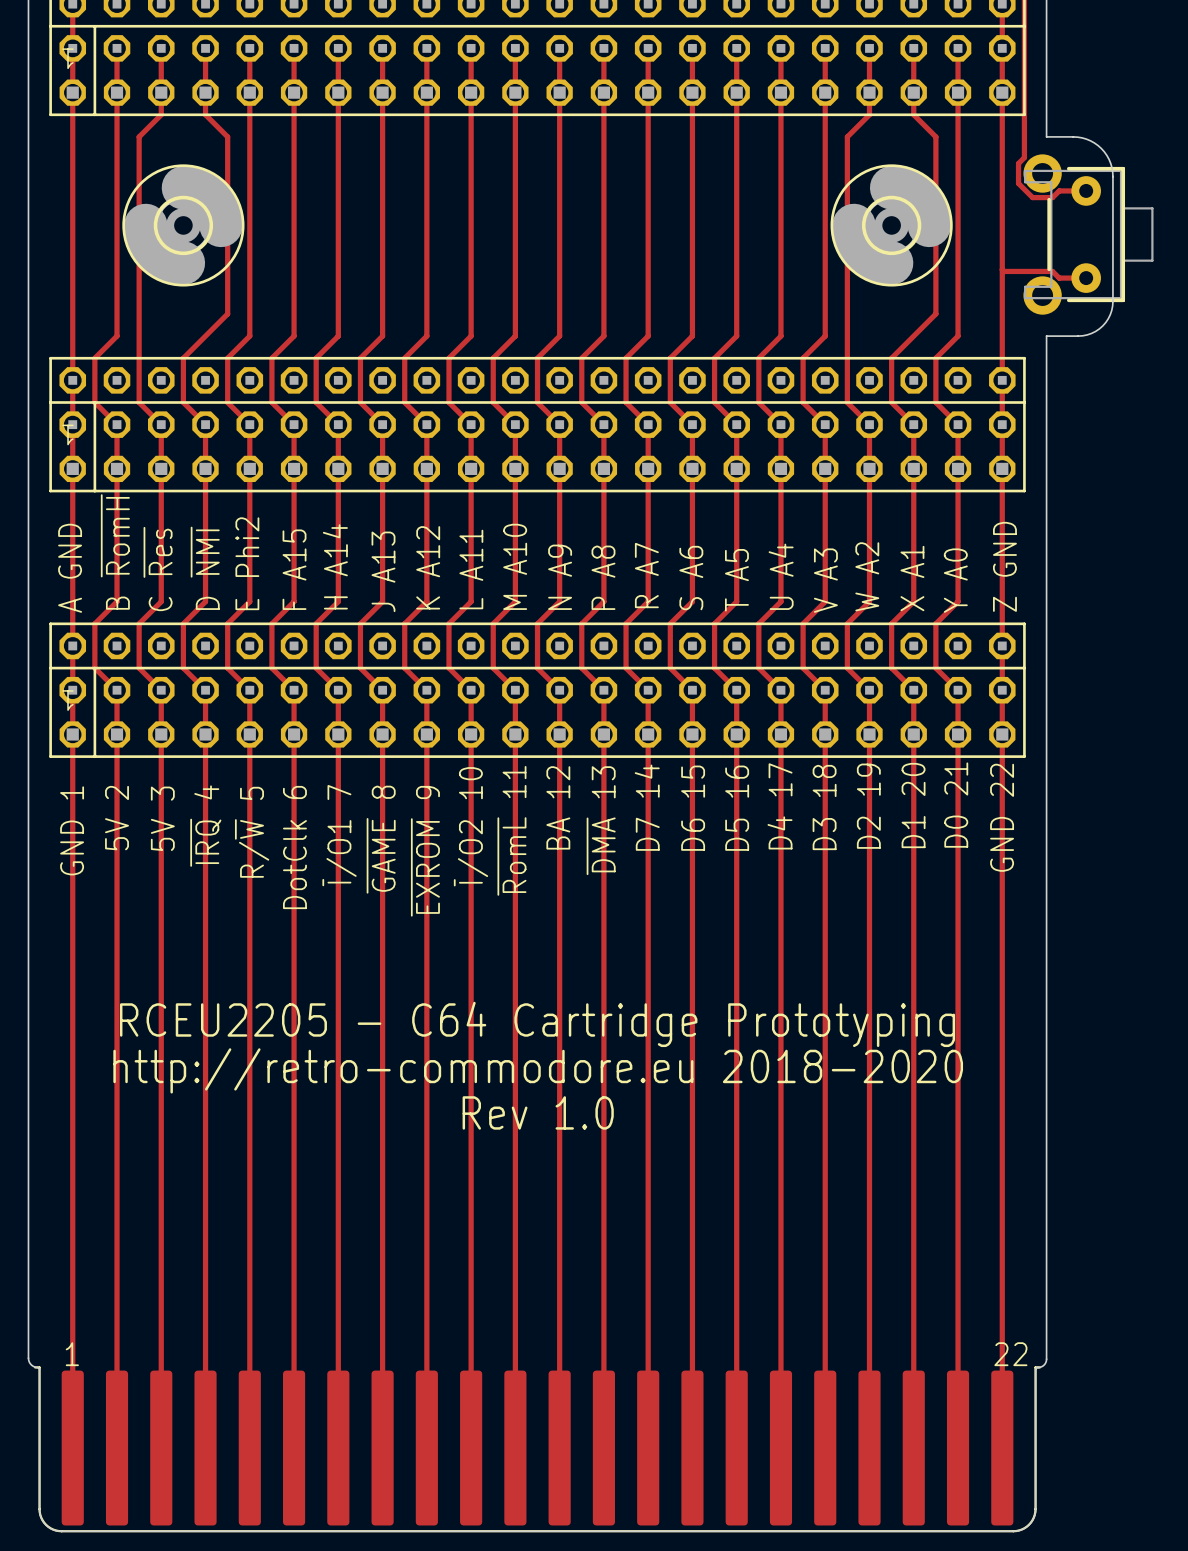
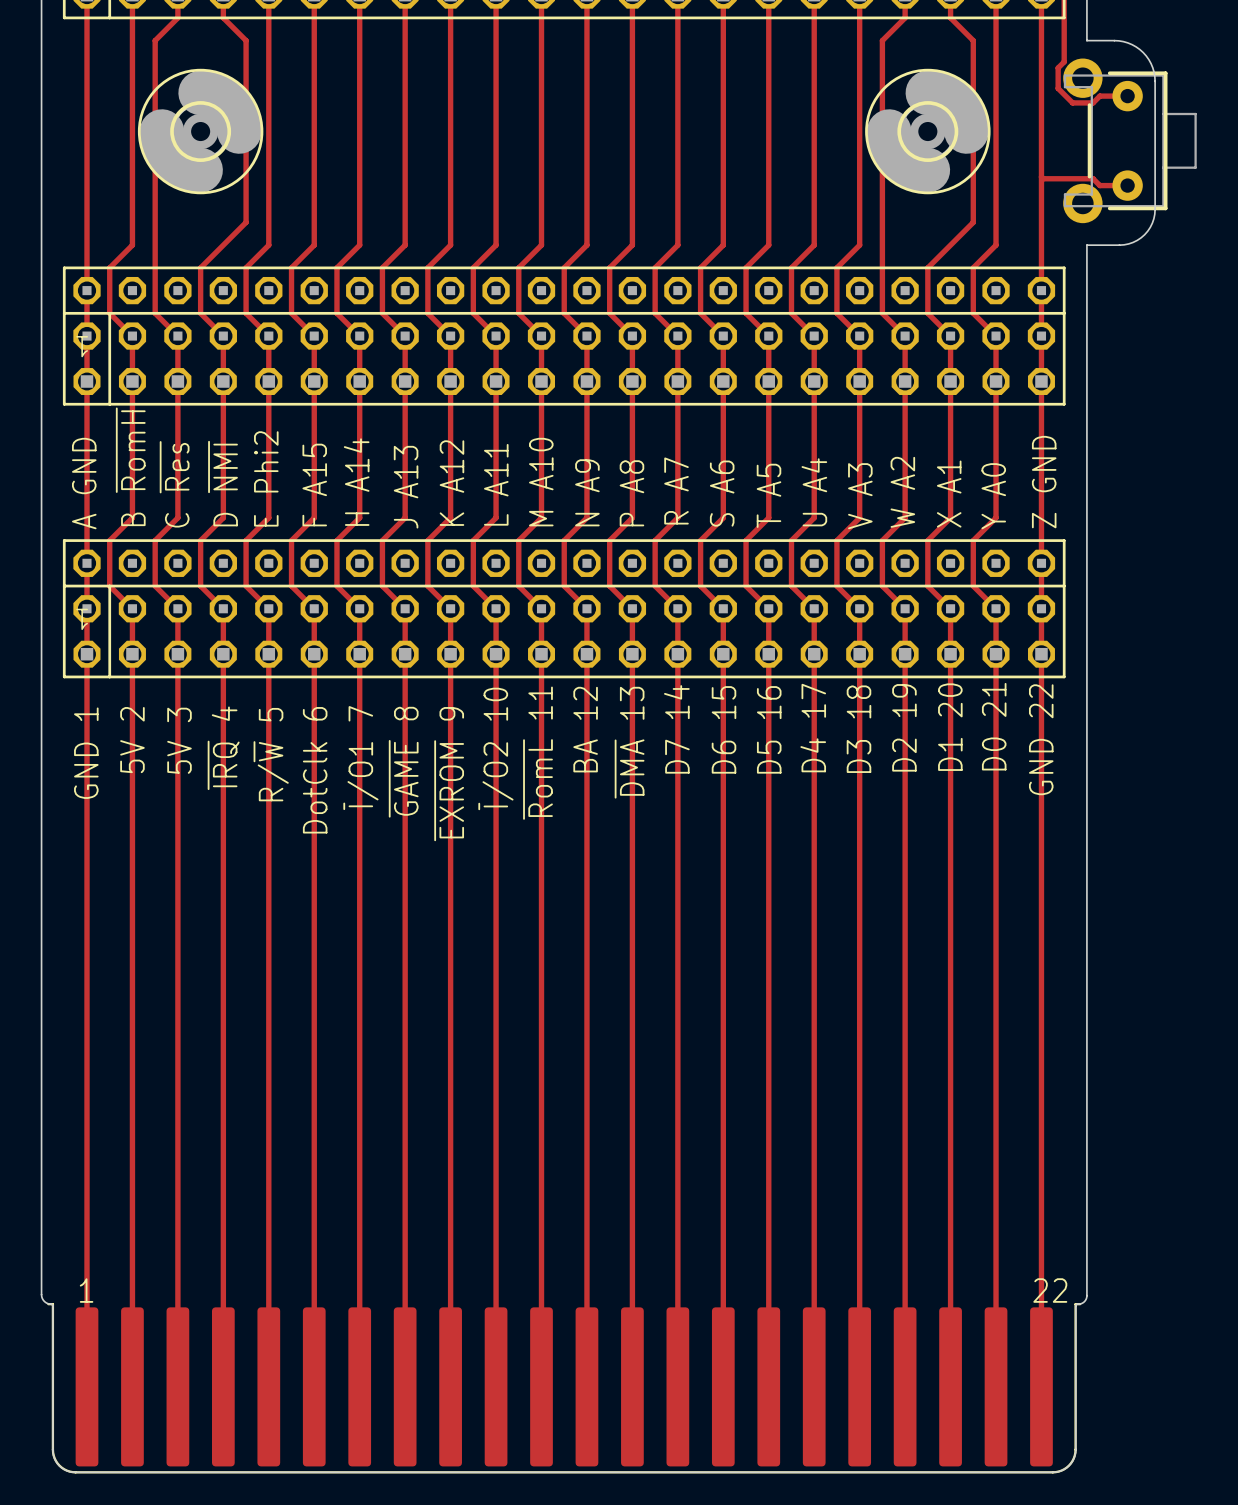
text: RCEU2205 - C64 Cartridge Prototyping (537, 1024) -> none
text: http://retro-commodore.eu 2018-2020 (538, 1070) -> none
text: Rev 1.0 (538, 1112) -> none

